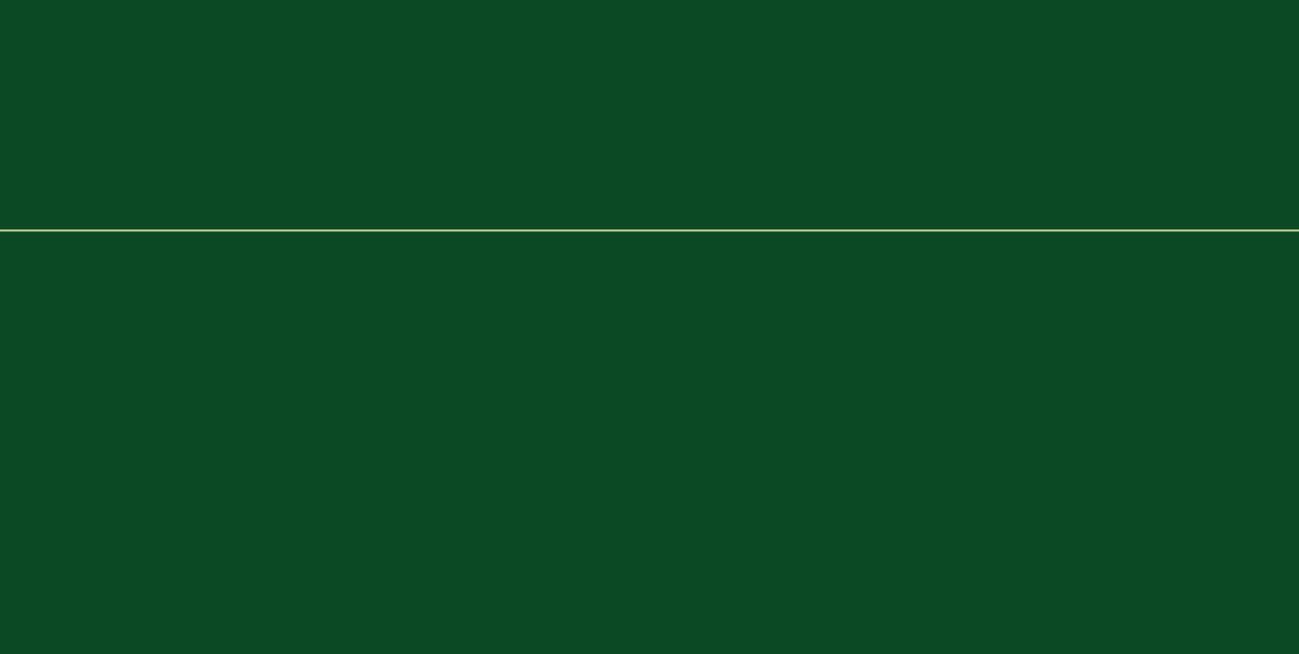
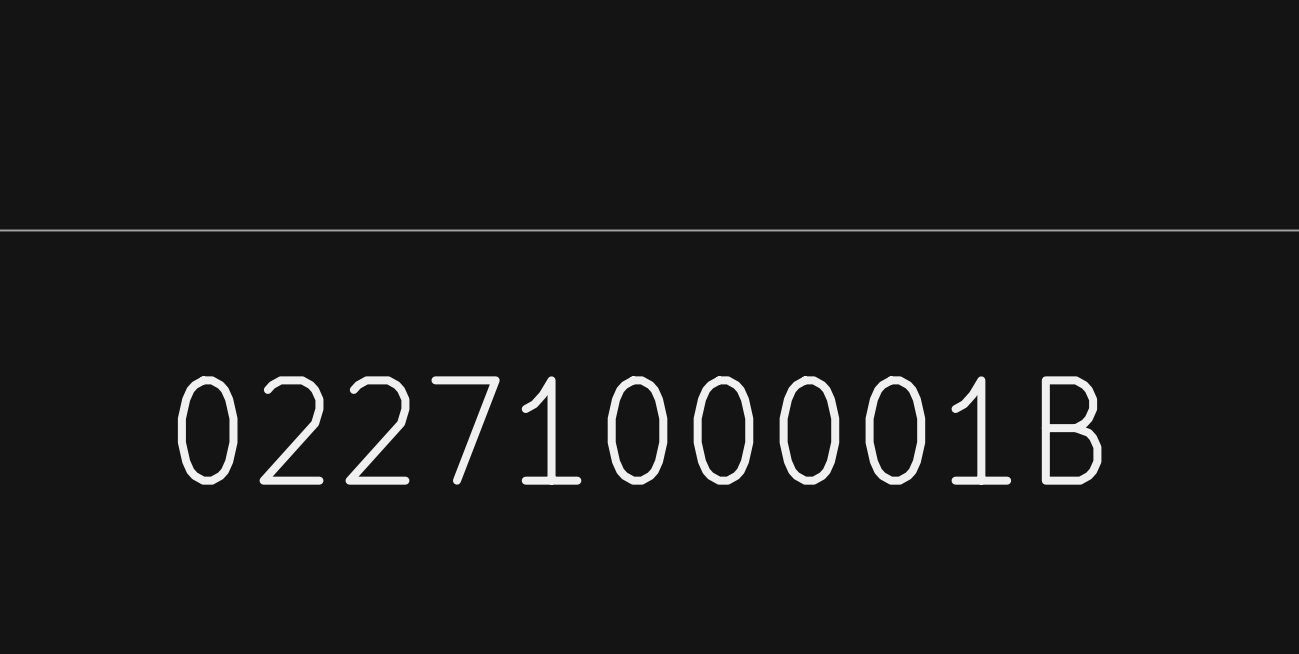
text: none -> 0227100001B (639, 430)

